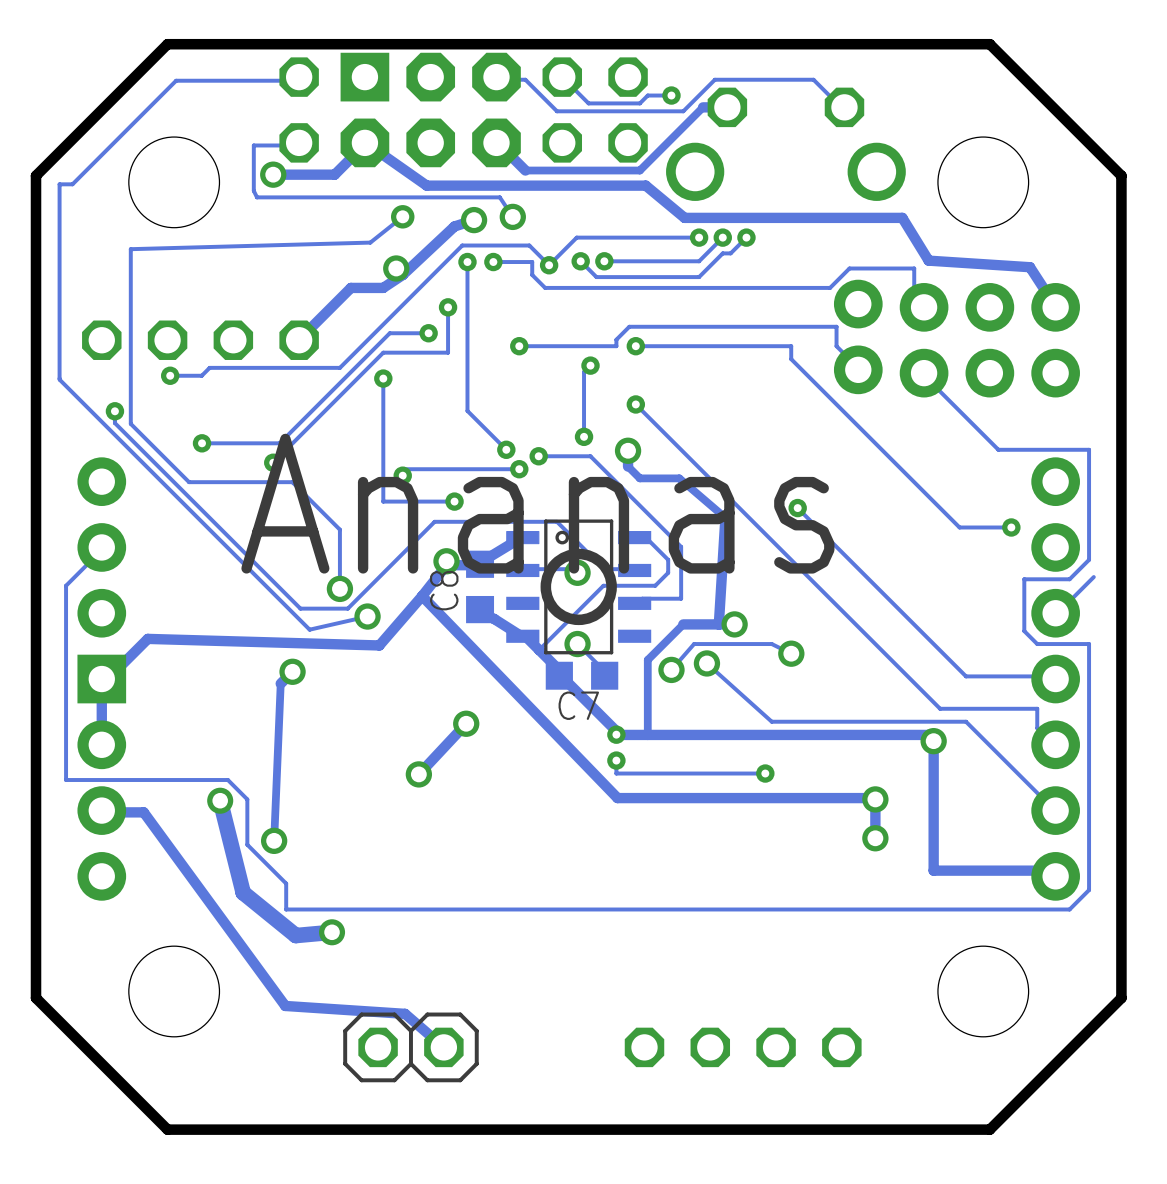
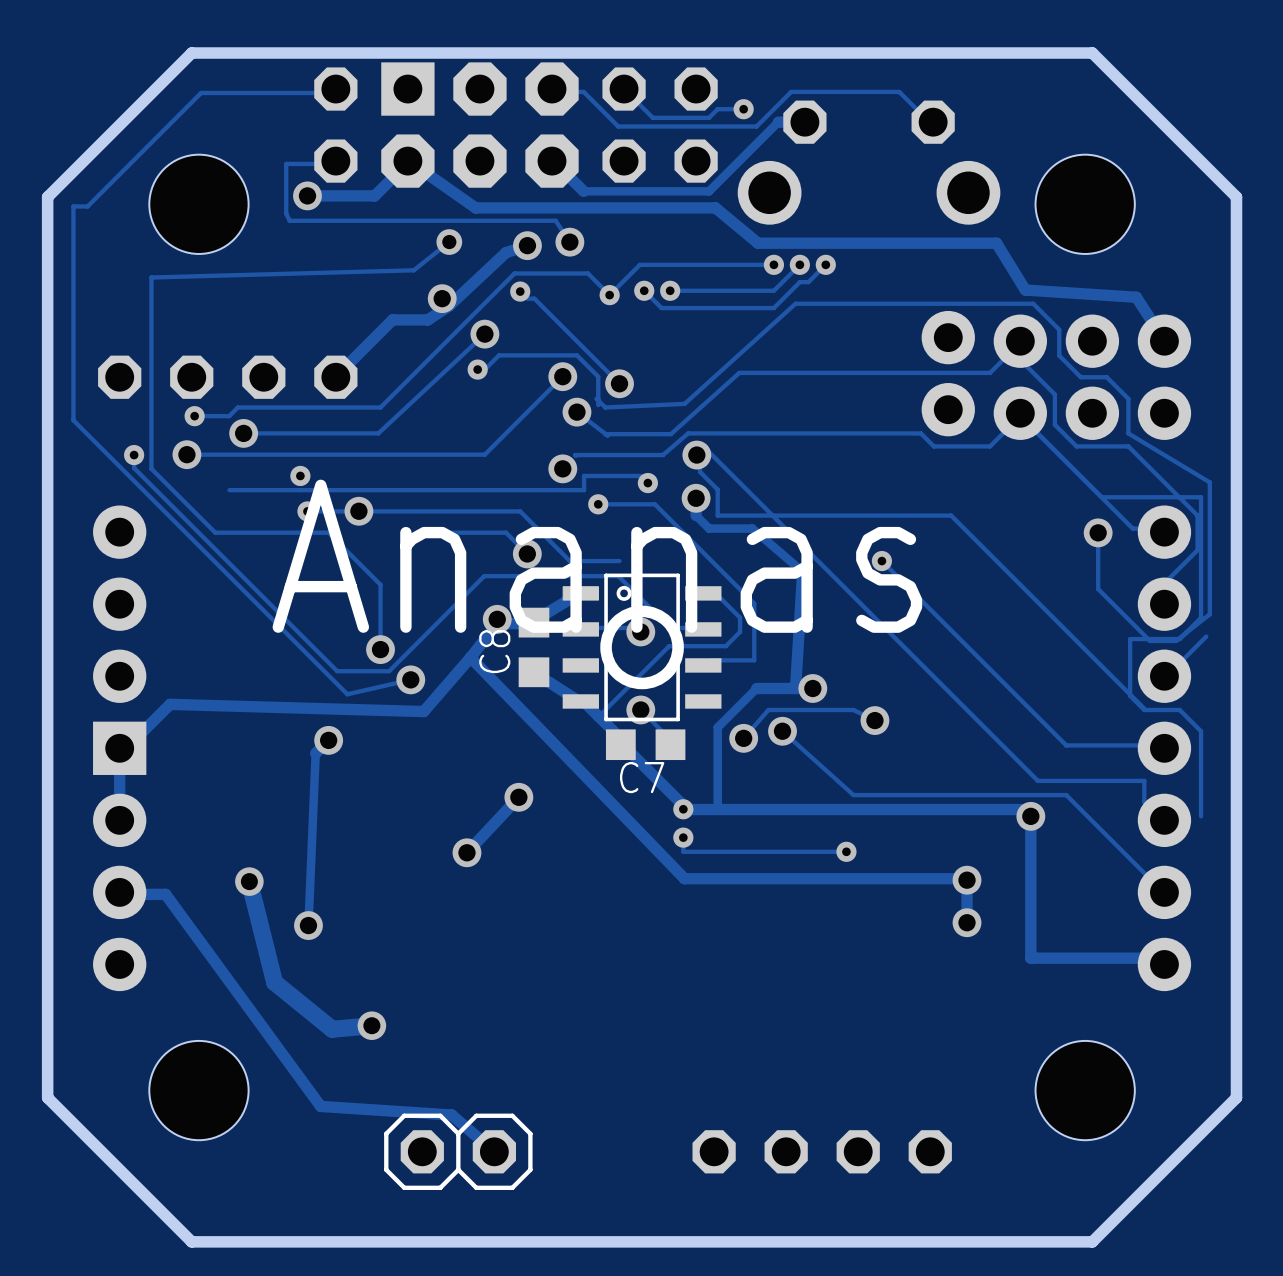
track: (467, 262) (467, 410) (506, 449) -> none
track: (493, 262) (532, 262) (532, 274) (545, 287) (830, 287) (849, 268) (914, 268) (914, 300) (920, 307) (924, 307) -> none
via: (493, 262) -> none
track: none -> (527, 298) (534, 298) (619, 383)
via size: [438, 298, 458, 317] -> [470, 319, 500, 349]
track: none -> (484, 334) (378, 433) (243, 433)
track: (448, 307) (448, 352) (383, 352) (273, 462) -> none
track: (428, 333) (389, 333) (279, 443) -> (640, 475) (584, 475) (584, 490) (314, 490)
via size: [510, 336, 529, 356] -> [548, 362, 578, 392]
track: none -> (477, 376) (498, 355) (576, 355) (598, 376) (598, 405)
track: none -> (562, 376) (484, 454) (186, 454)
track: (519, 346) (616, 346) (616, 339) (629, 326) (836, 326) (836, 346) (858, 369) -> none
via: none -> (619, 383)
track: (635, 346) (791, 346) (791, 359) (959, 527) (1011, 527) -> none
via: (635, 346) -> none
track: none -> (598, 398) (596, 398) (605, 407) (684, 403) (795, 303) (1033, 303) (1059, 329) (1059, 355) (1080, 377) (1106, 377) (1128, 398) (1128, 433) (1209, 482) (1209, 614) (1175, 640) (1150, 640) (1098, 589) (1098, 532)
track: (590, 365) (584, 372) (584, 436) -> none
via: (590, 365) -> none
track: none -> (576, 412) (607, 435) (605, 434) (670, 434) (739, 372) (990, 372) (1020, 341) (1011, 351) (1054, 394) (1054, 424) (1076, 446) (1128, 446) (1197, 515) (1197, 550) (1167, 580) (1167, 602) (1165, 603)
via: none -> (576, 412)
track: (383, 378) (383, 501) (454, 501) -> none
via: (383, 378) -> none
via: none -> (243, 433)
via size: [626, 395, 646, 414] -> [682, 440, 712, 470]
via: none -> (186, 454)
track: none -> (575, 455) (662, 455) (688, 433) (920, 433) (933, 446) (990, 446) (1020, 416) (1132, 528) (1163, 528) (1164, 532)
track: none -> (696, 455) (700, 472) (717, 489) (717, 515) (951, 515) (1145, 710)
via: none -> (562, 468)
via: none -> (300, 475)
via: (202, 443) -> none
via: (506, 449) -> none
track: none -> (300, 511) (520, 511) (569, 561) (619, 561)
via: none -> (358, 511)
track: (519, 469) (402, 469) (402, 475) -> none
via: (519, 469) -> none
via: (402, 475) -> none
track: none -> (420, 532) (506, 532) (527, 553)
via: none -> (1098, 532)
via position: (454, 501) -> (527, 553)
via: (1011, 527) -> none
track: (101, 547) (98, 553) (66, 585) (66, 780) (227, 780) (247, 799) (247, 844) (286, 883) (286, 909) (1069, 909) (1089, 890) (1089, 741) -> none
track: (1069, 644) (1089, 644) (1089, 663) -> (1179, 709) (1201, 731)

